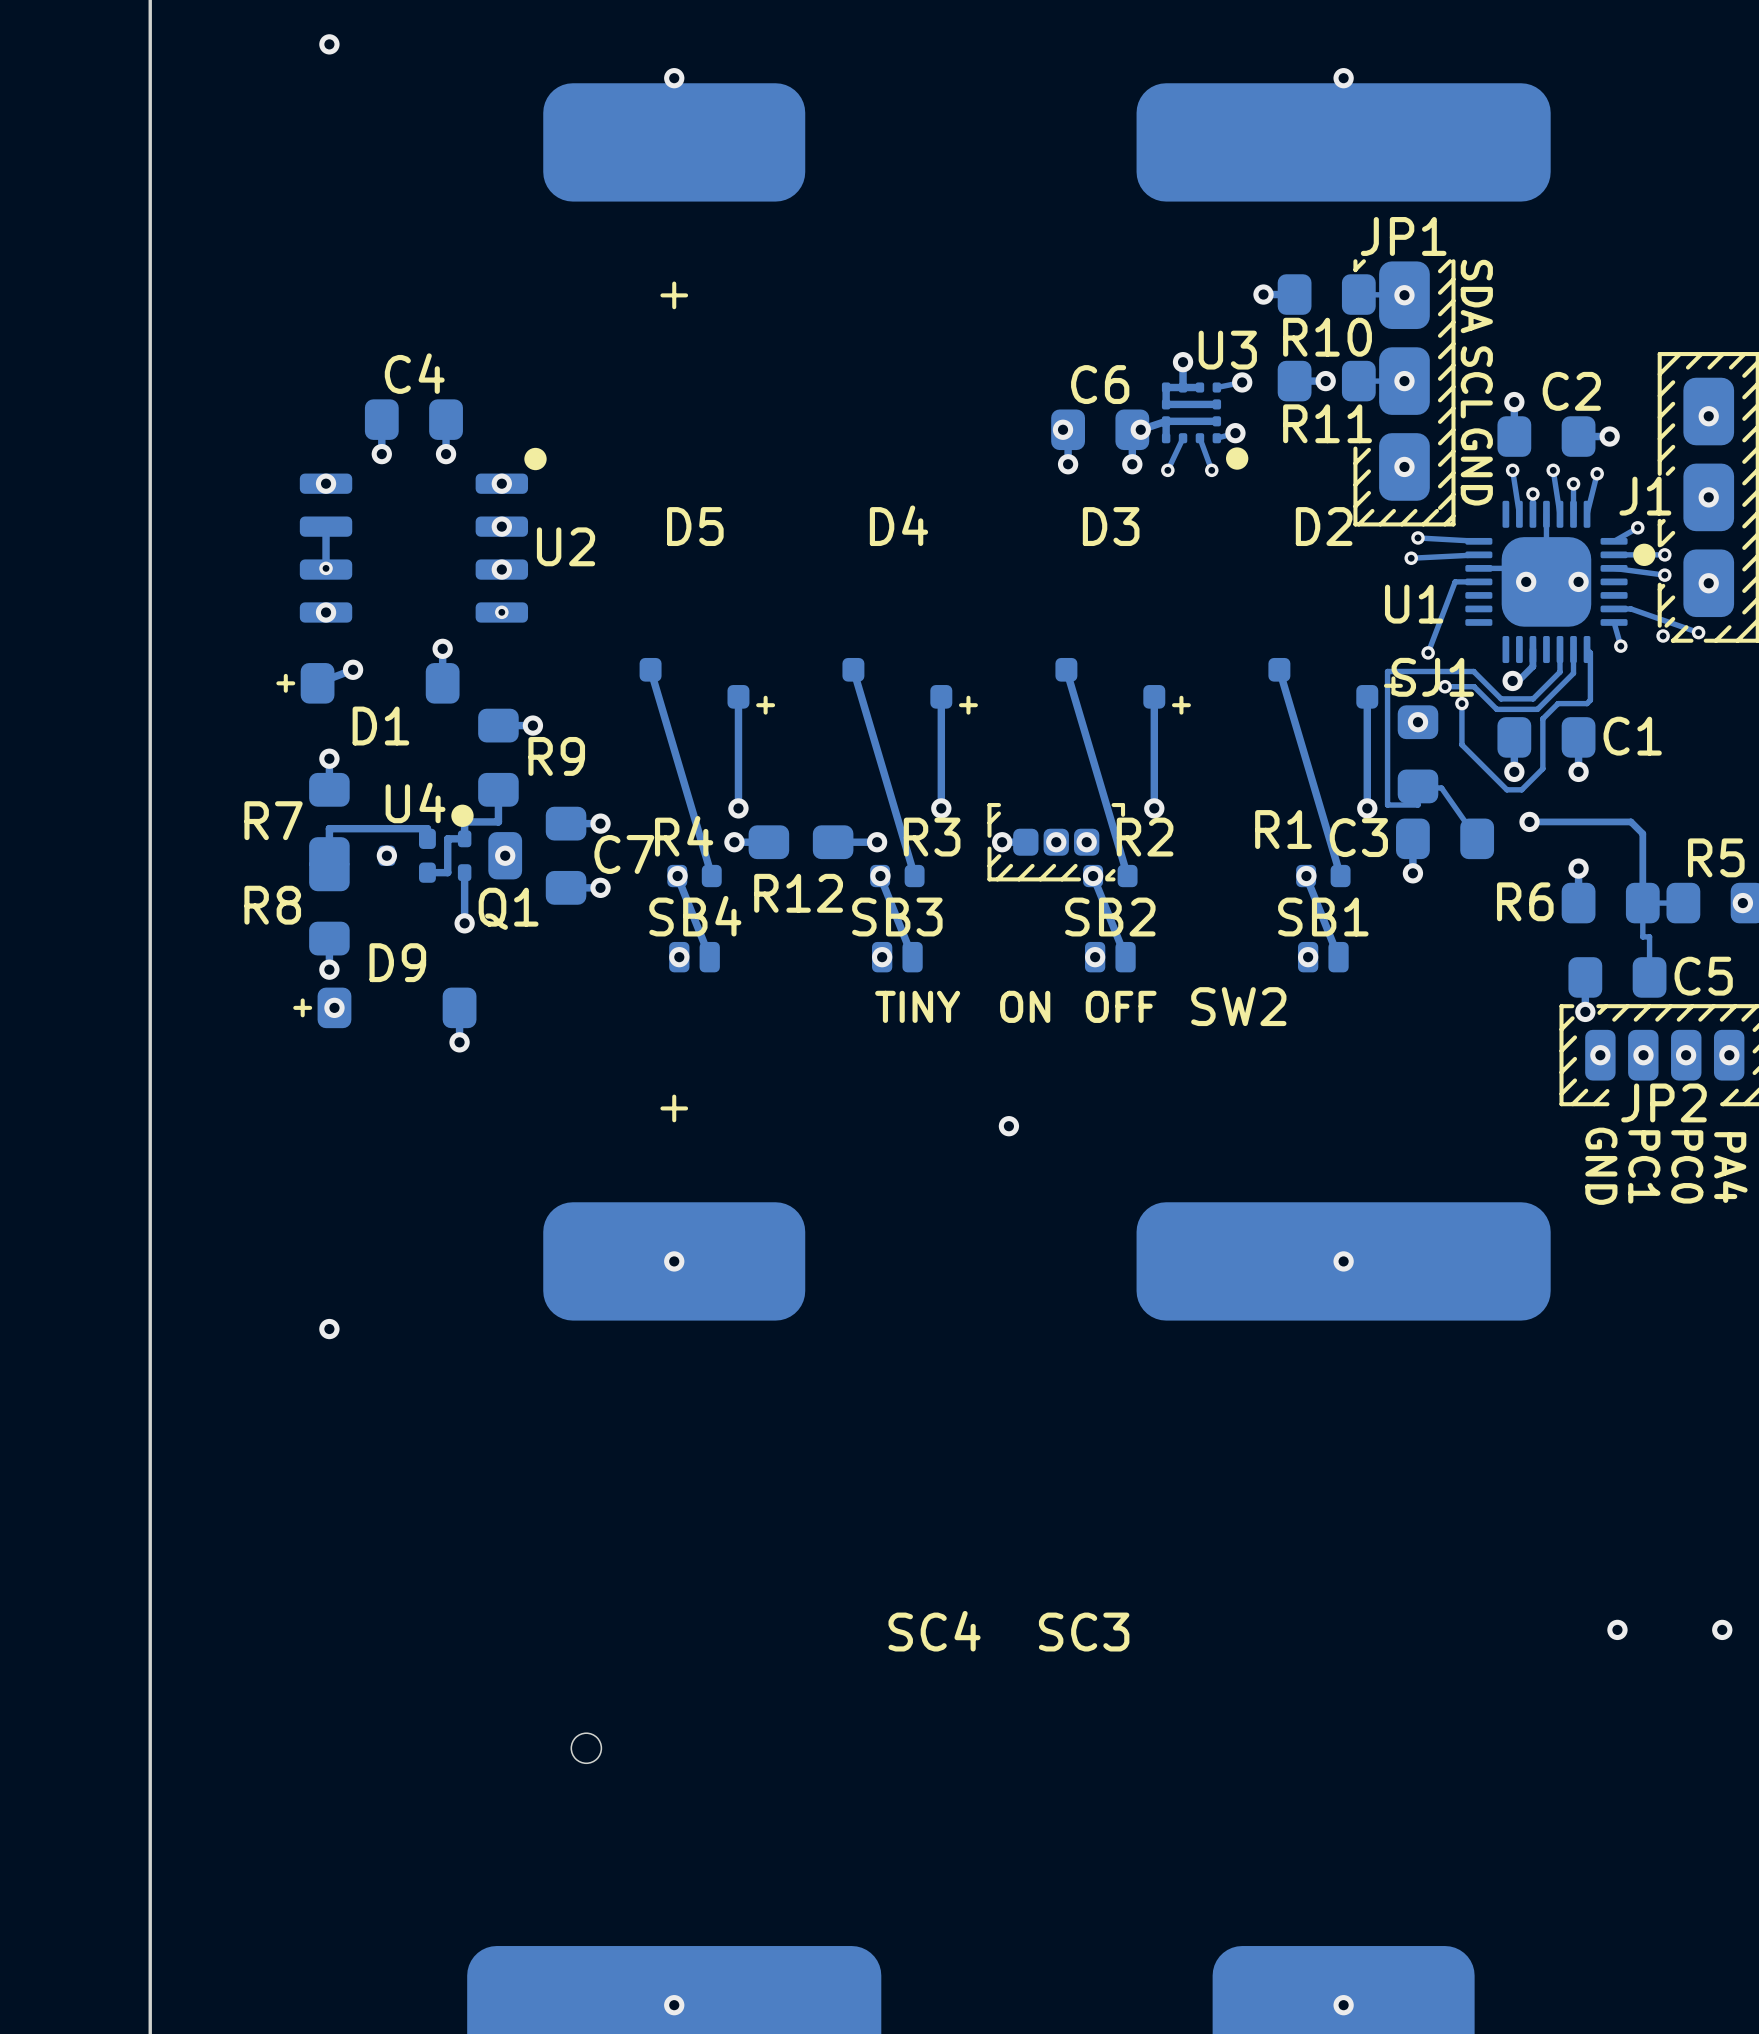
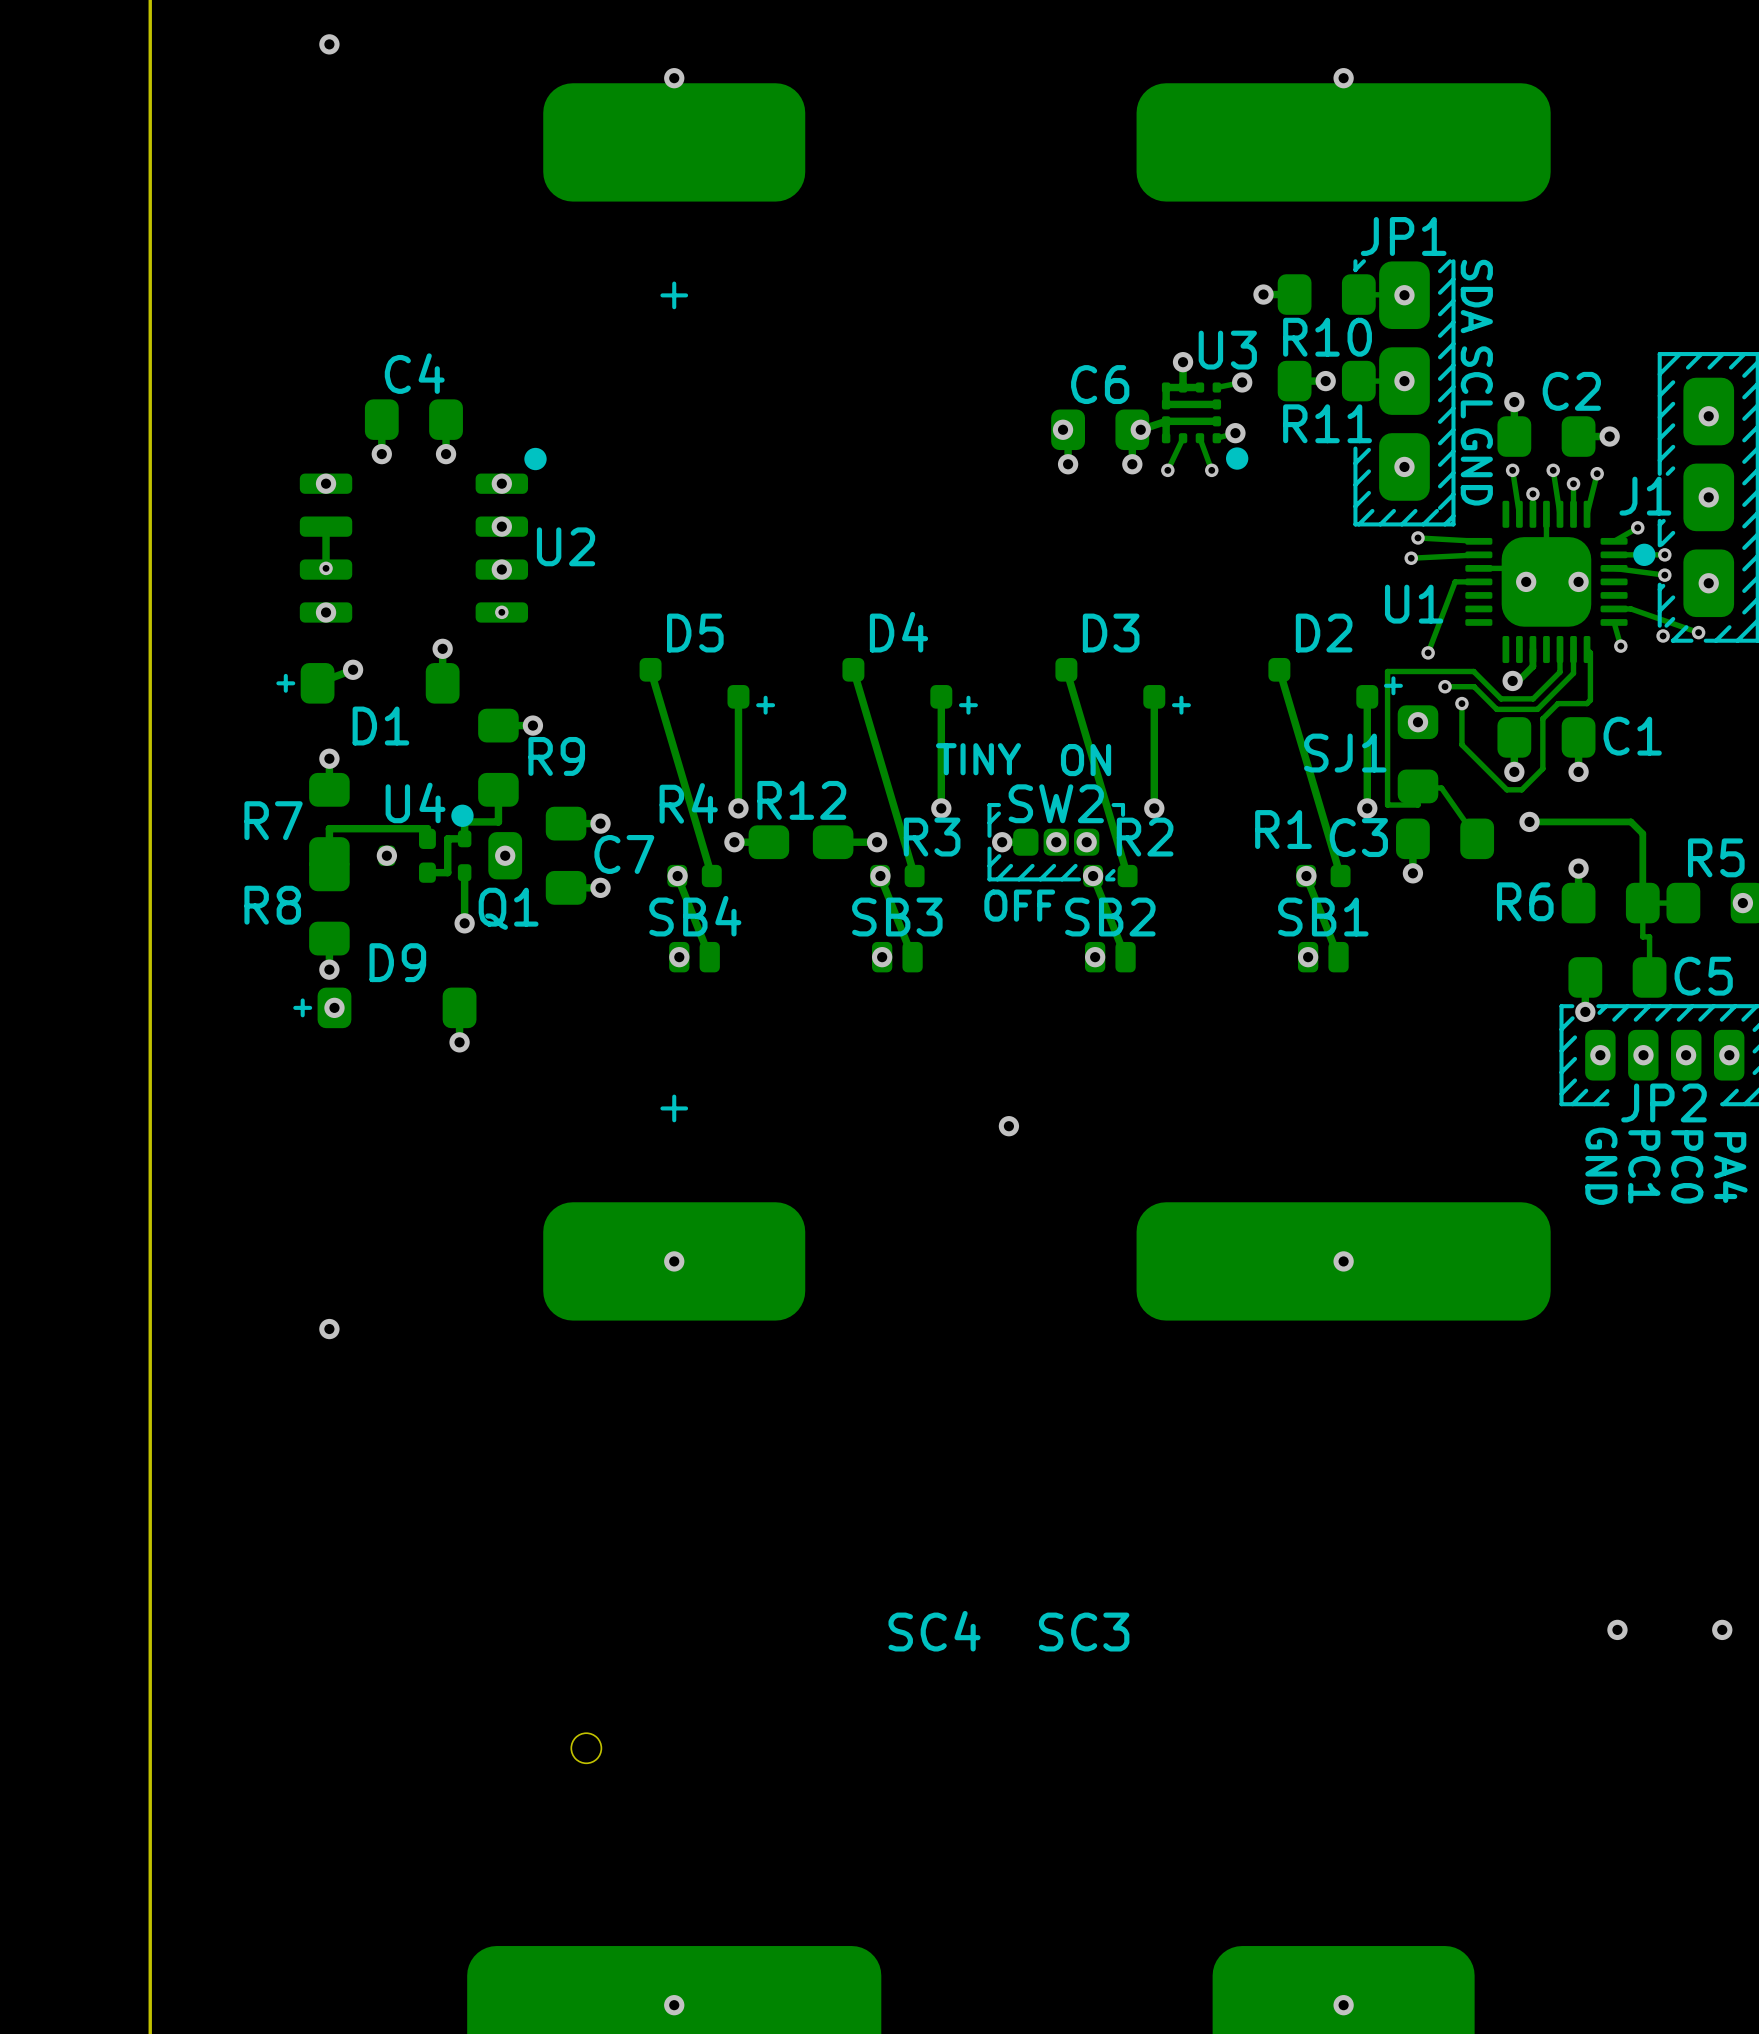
D4 name position: D4 (898, 525) -> D4 (898, 632)
D5 name position: D5 (695, 526) -> D5 (695, 633)
D3 name position: D3 (1111, 526) -> D3 (1111, 633)
D2 name position: D2 (1324, 526) -> D2 (1324, 633)
SJ1 name position: SJ1 (1432, 677) -> SJ1 (1345, 753)
R4 name position: R4 (684, 836) -> R4 (688, 803)
R12 name position: R12 (798, 893) -> R12 (801, 800)
text position: TINY (917, 1006) -> TINY (978, 759)
text position: ON (1025, 1006) -> ON (1086, 760)
text position: OFF (1121, 1006) -> OFF (1019, 905)
SW2 name position: SW2 (1238, 1006) -> SW2 (1056, 803)

